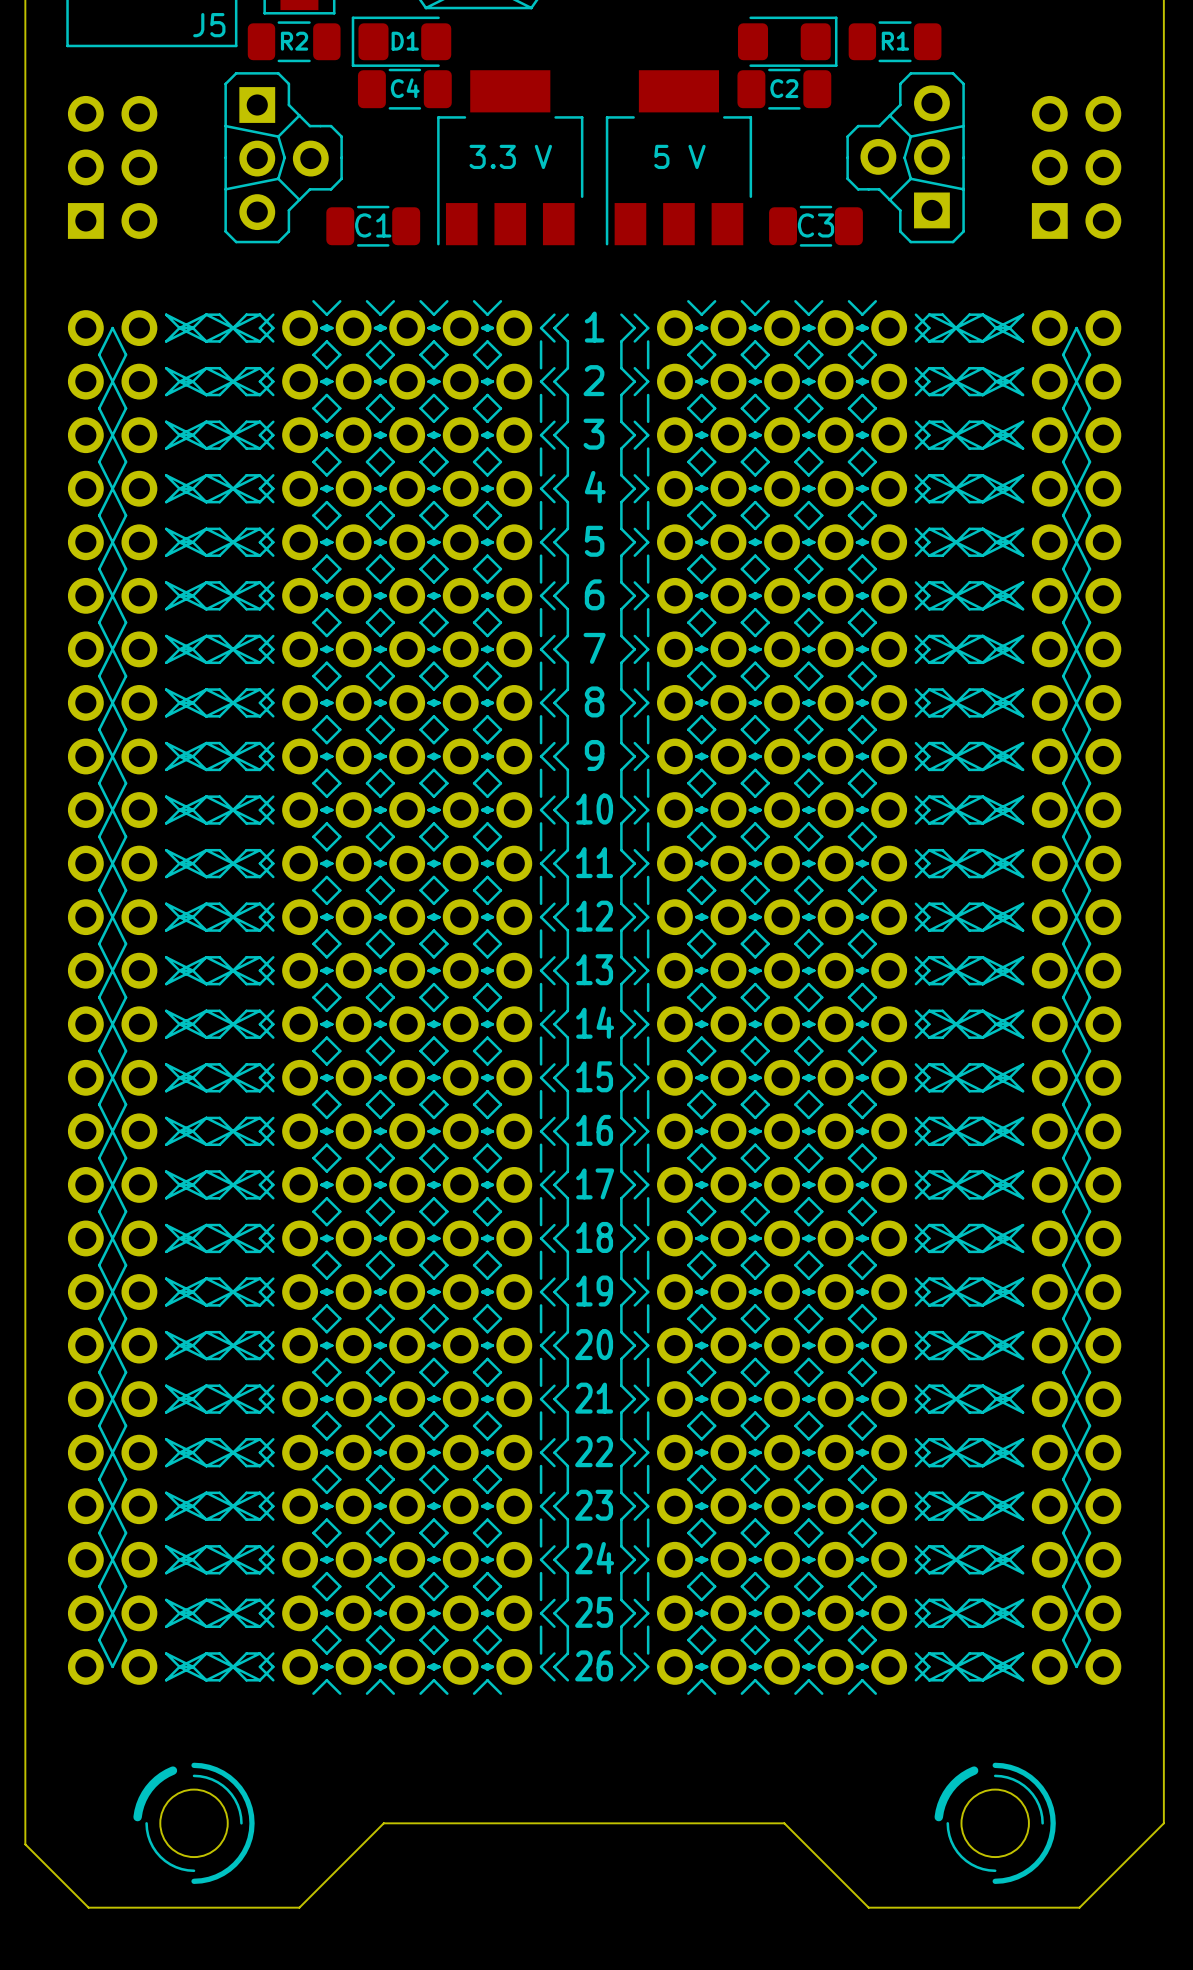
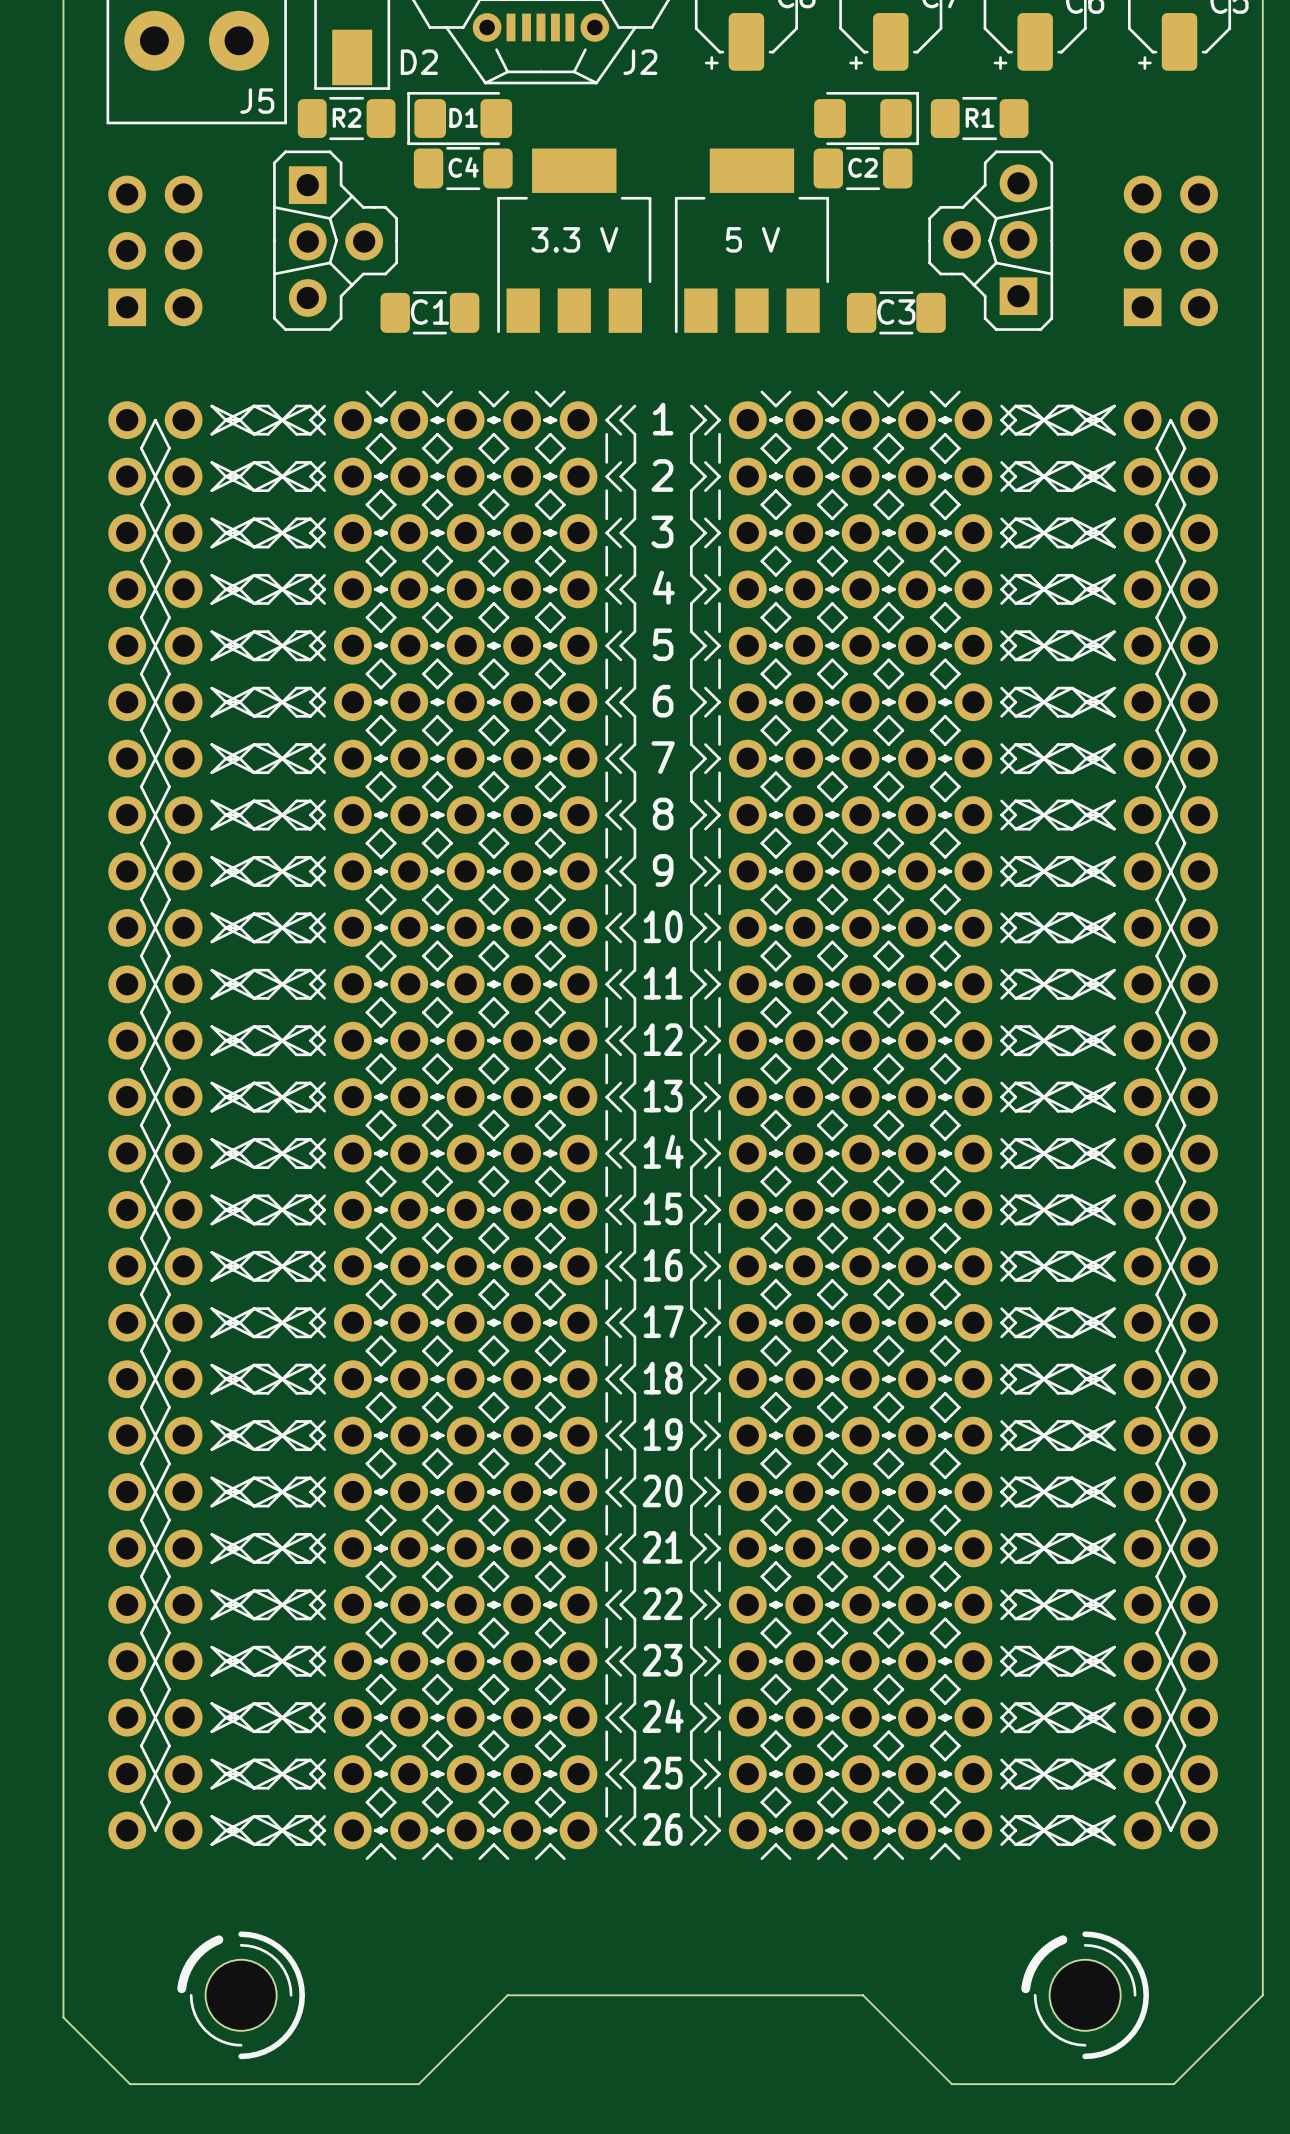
board edge: (447, 1823) (383, 1823) (299, 1907) -> (507, 1995) (418, 2084) (352, 2084)

